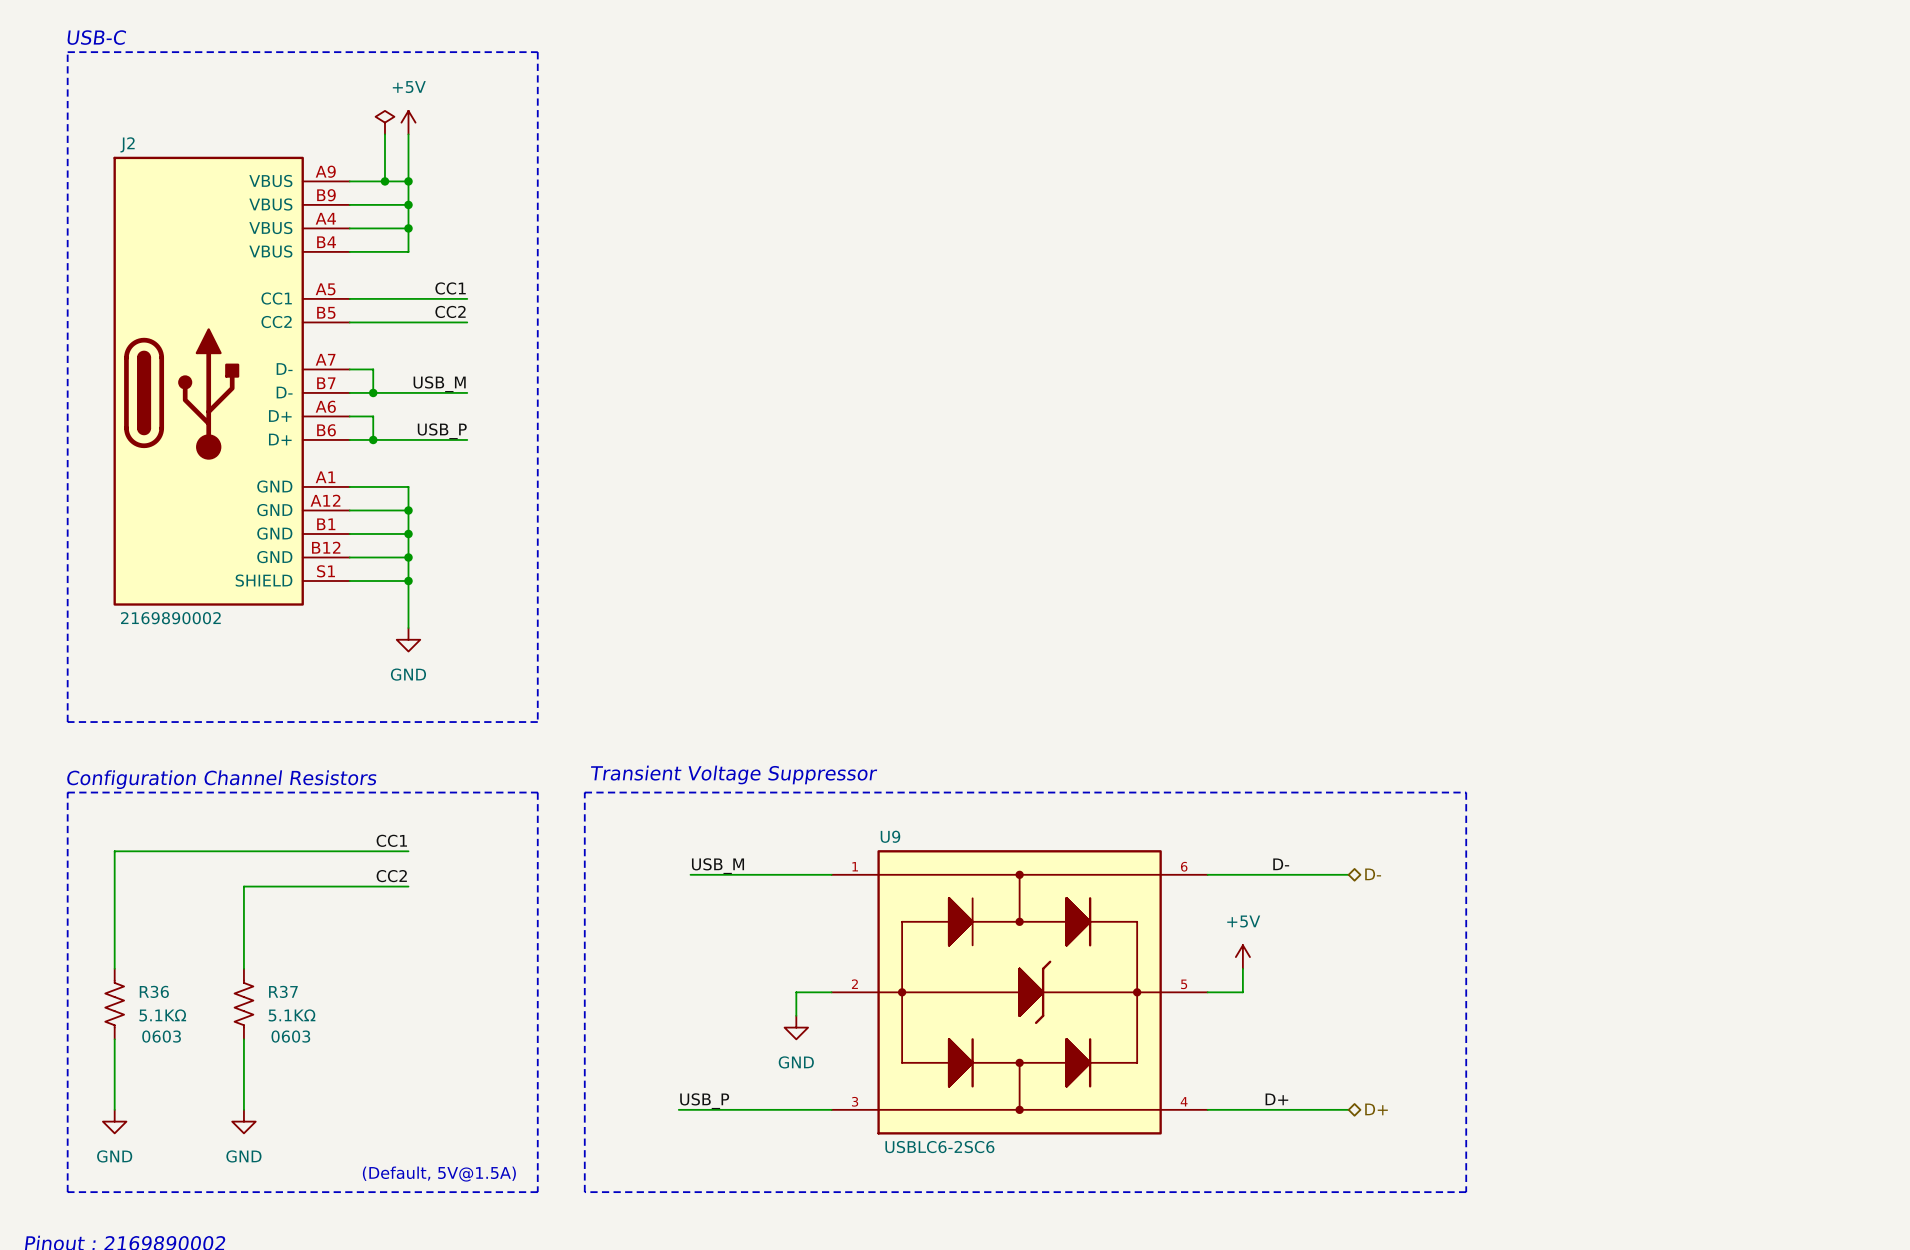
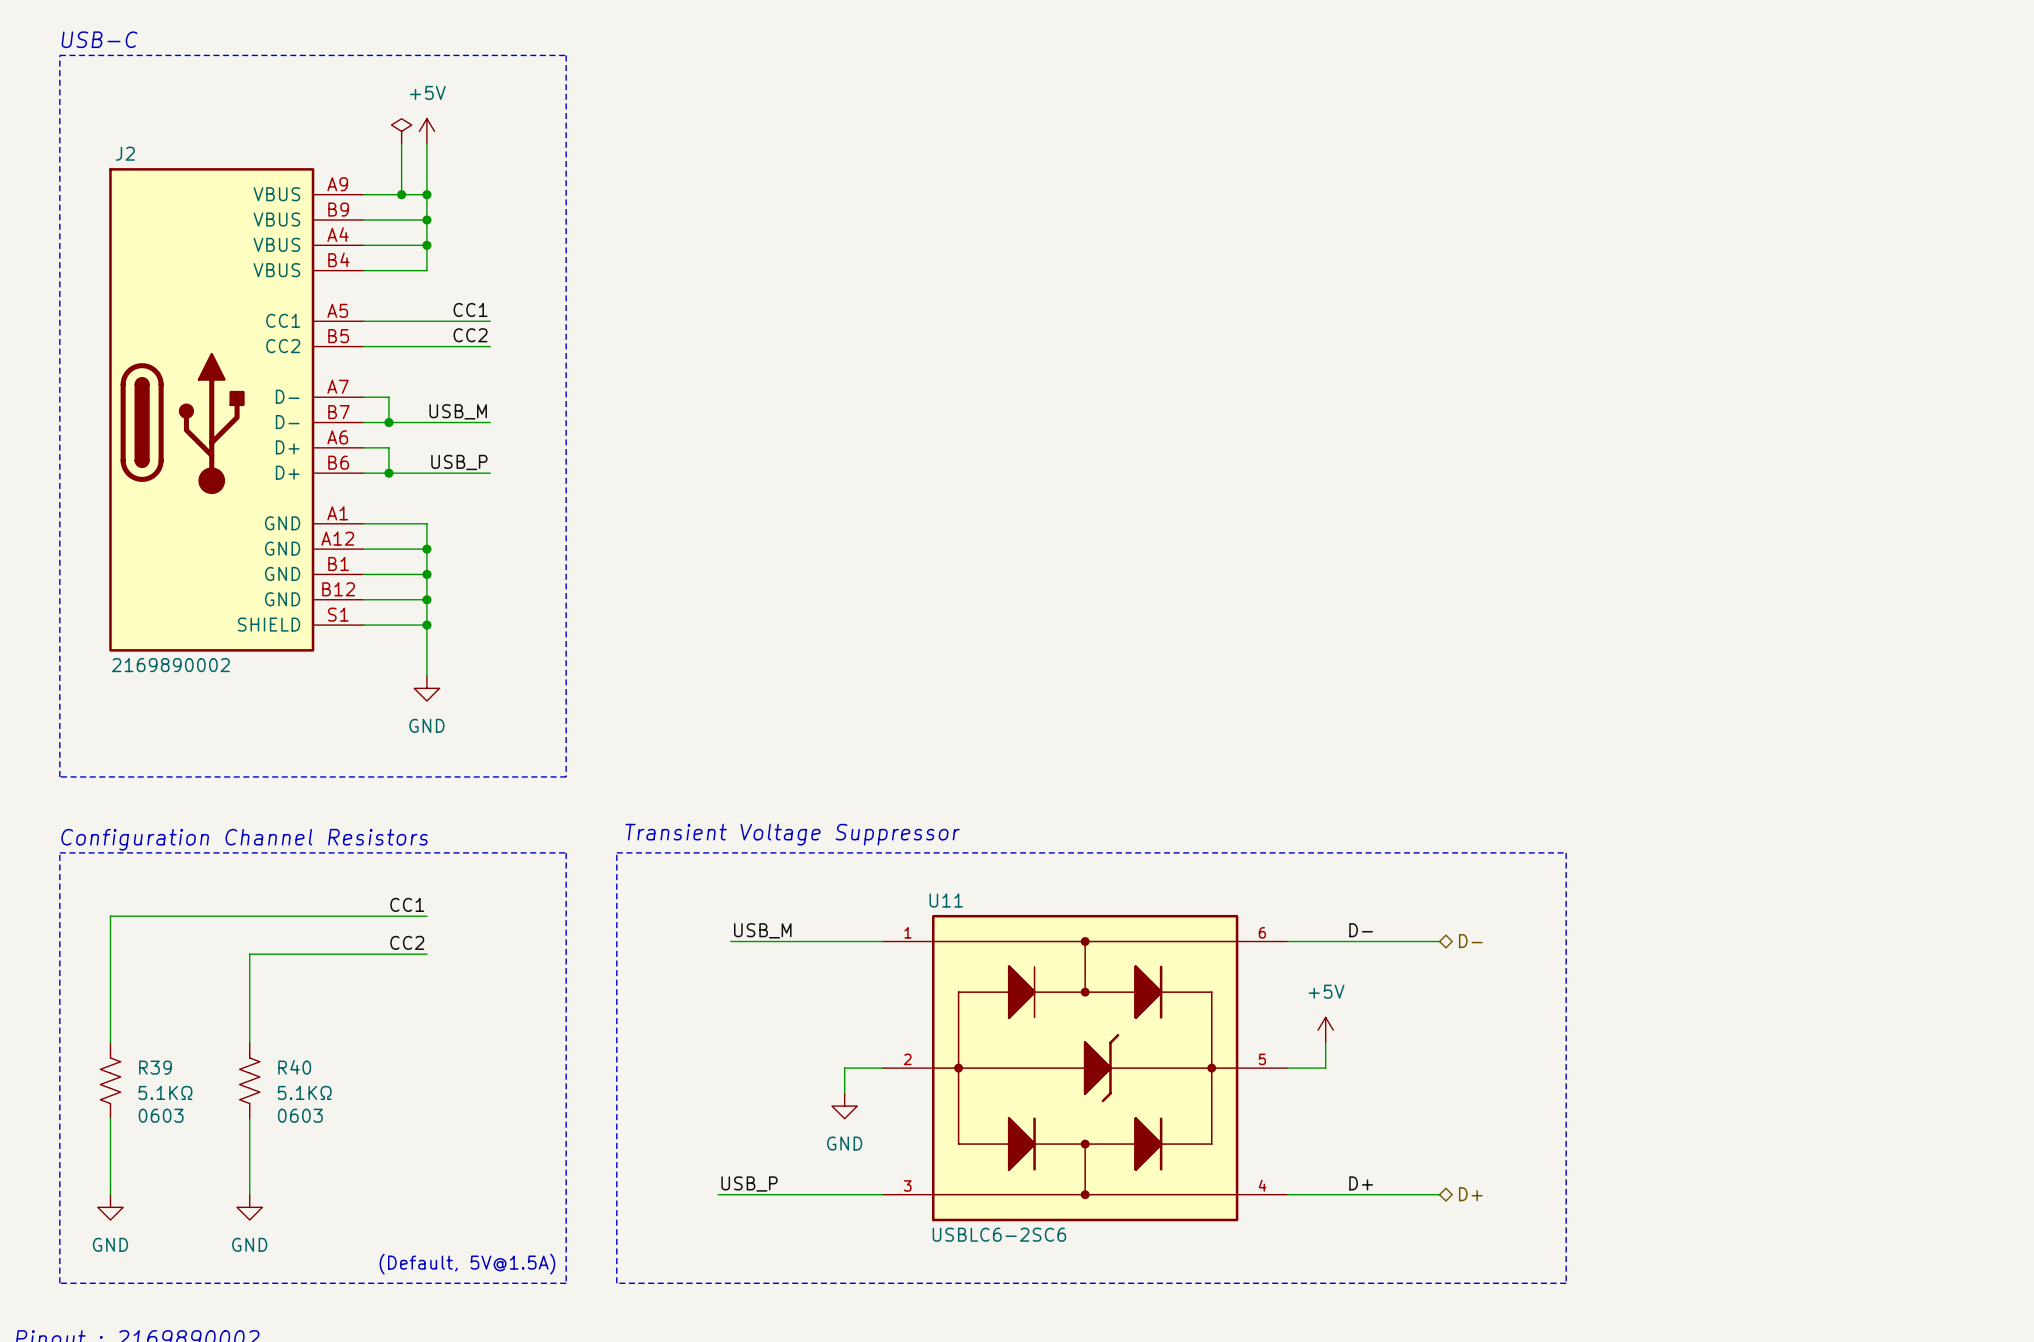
U9 name: U9 (890, 836) -> U11 (946, 900)
R36 name: R36 (154, 991) -> R39 (155, 1067)
R37 name: R37 (283, 991) -> R40 (294, 1067)

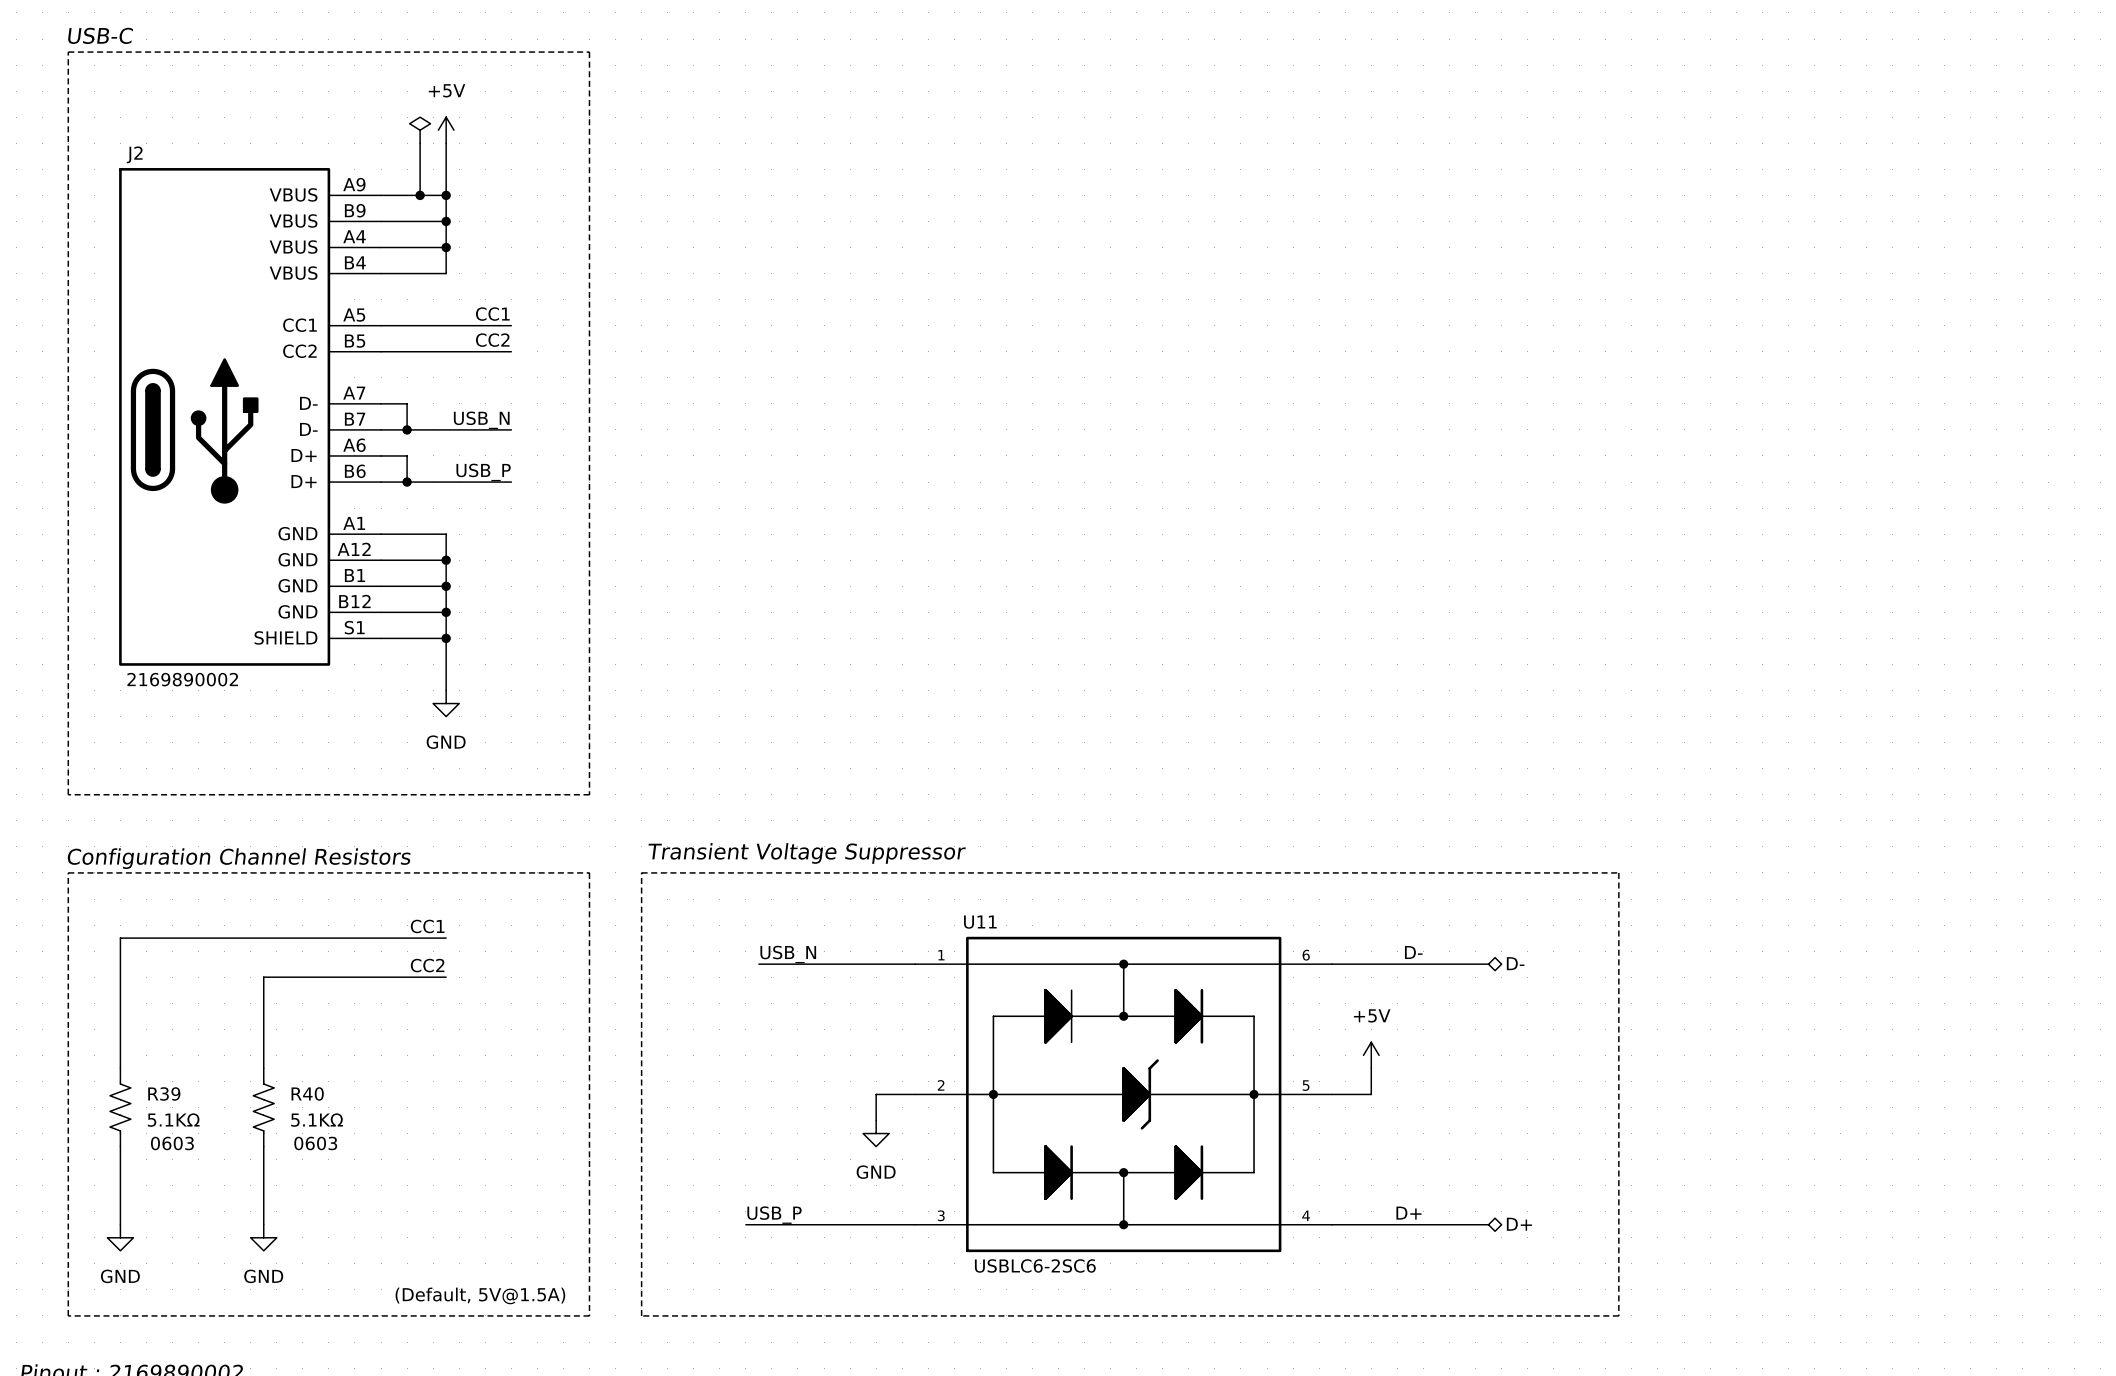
label: USB_M (458, 411) -> USB_N (481, 420)
label: USB_M (762, 930) -> USB_N (788, 954)

